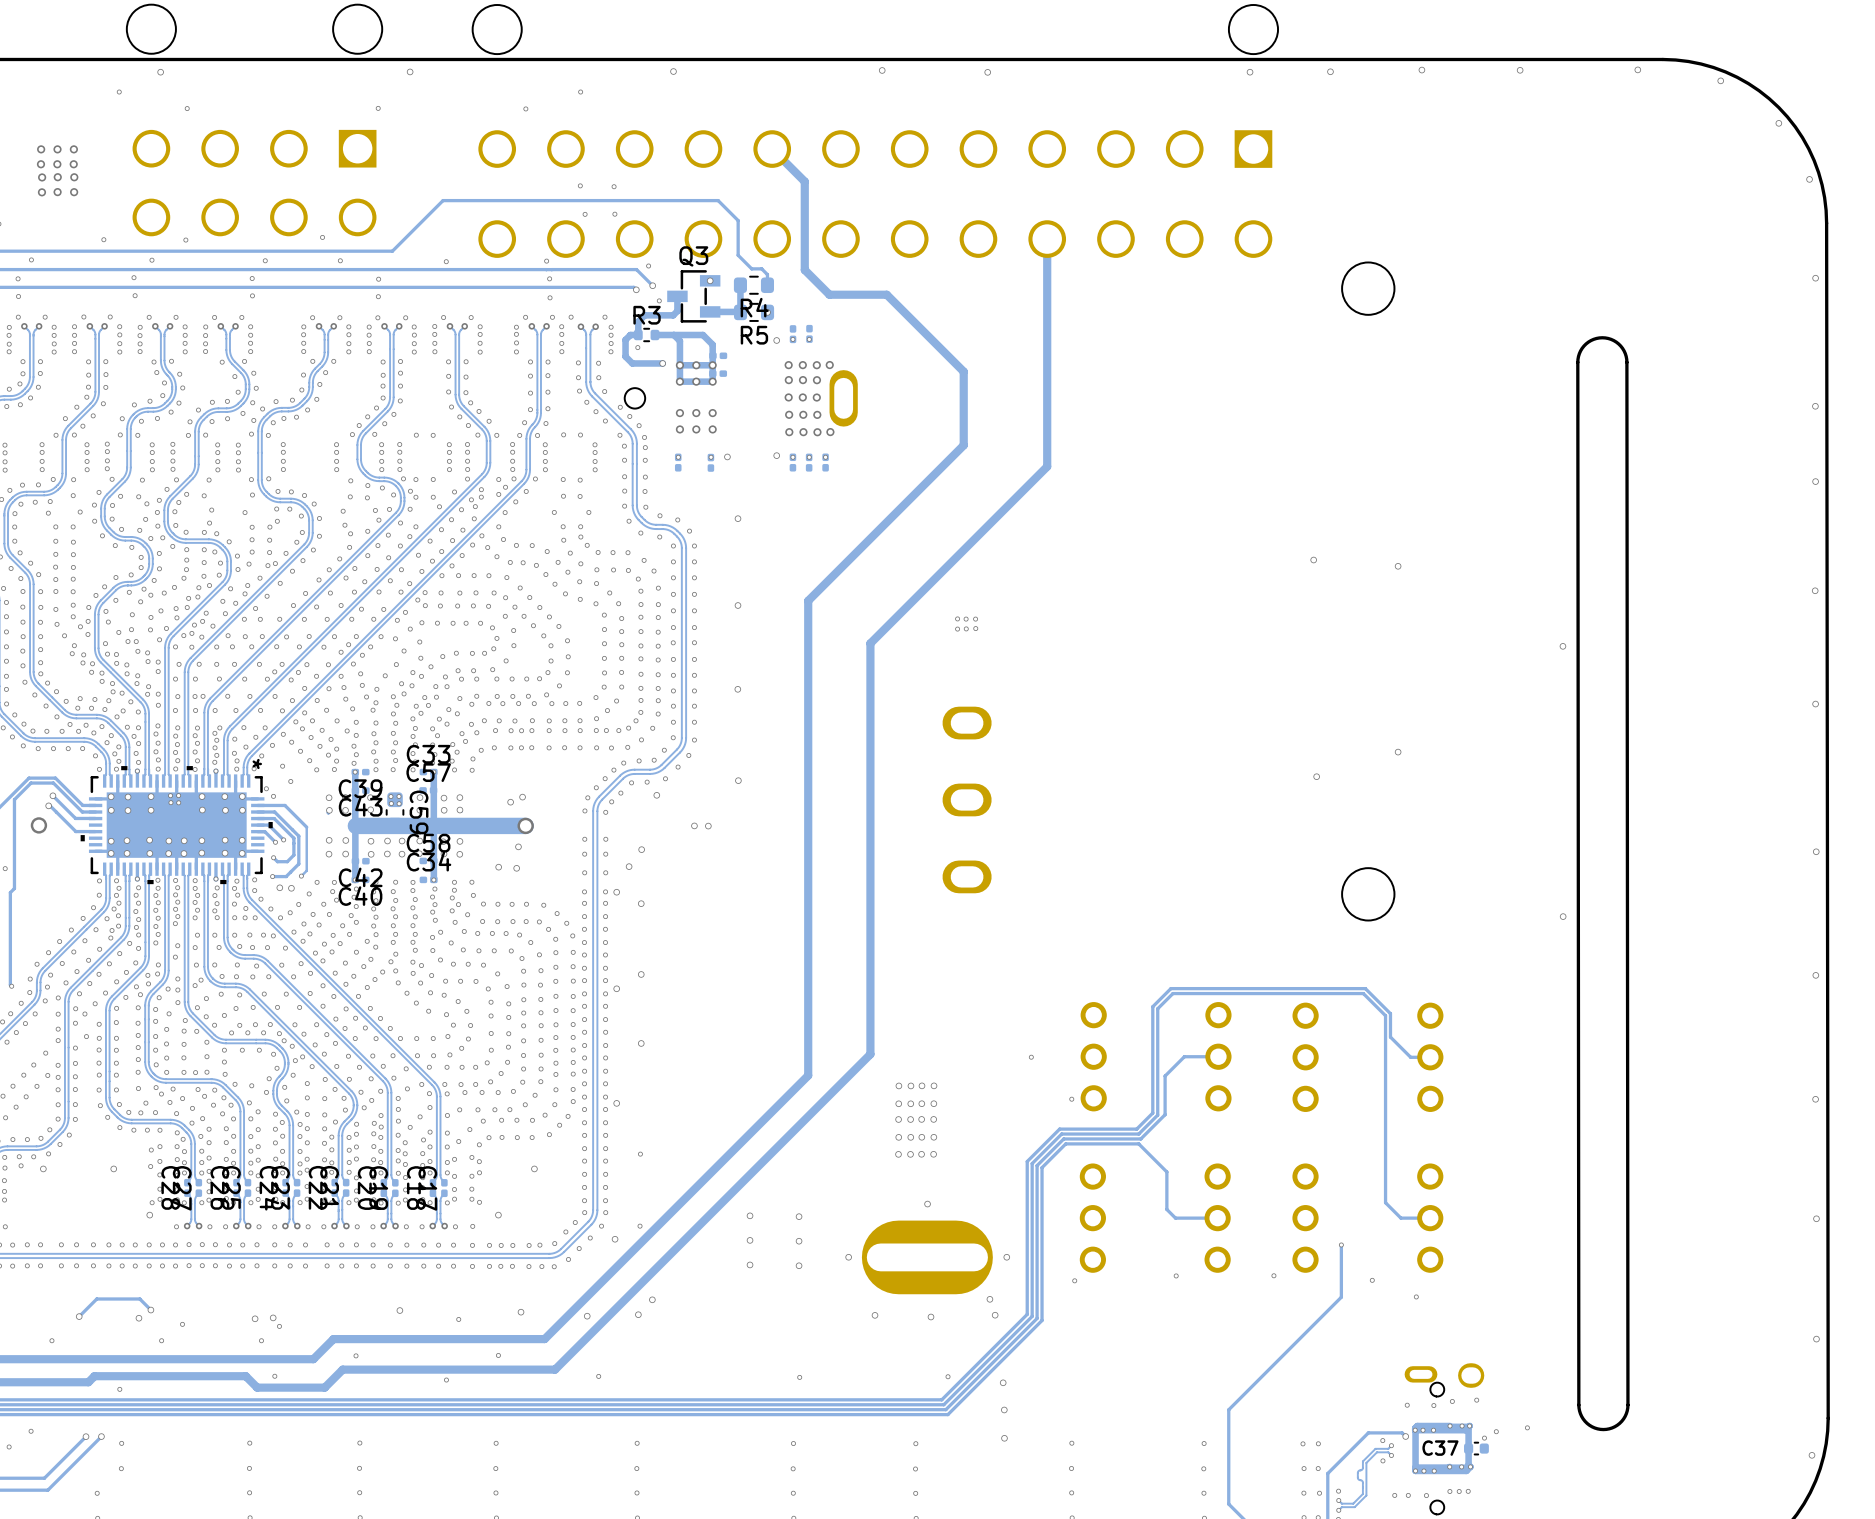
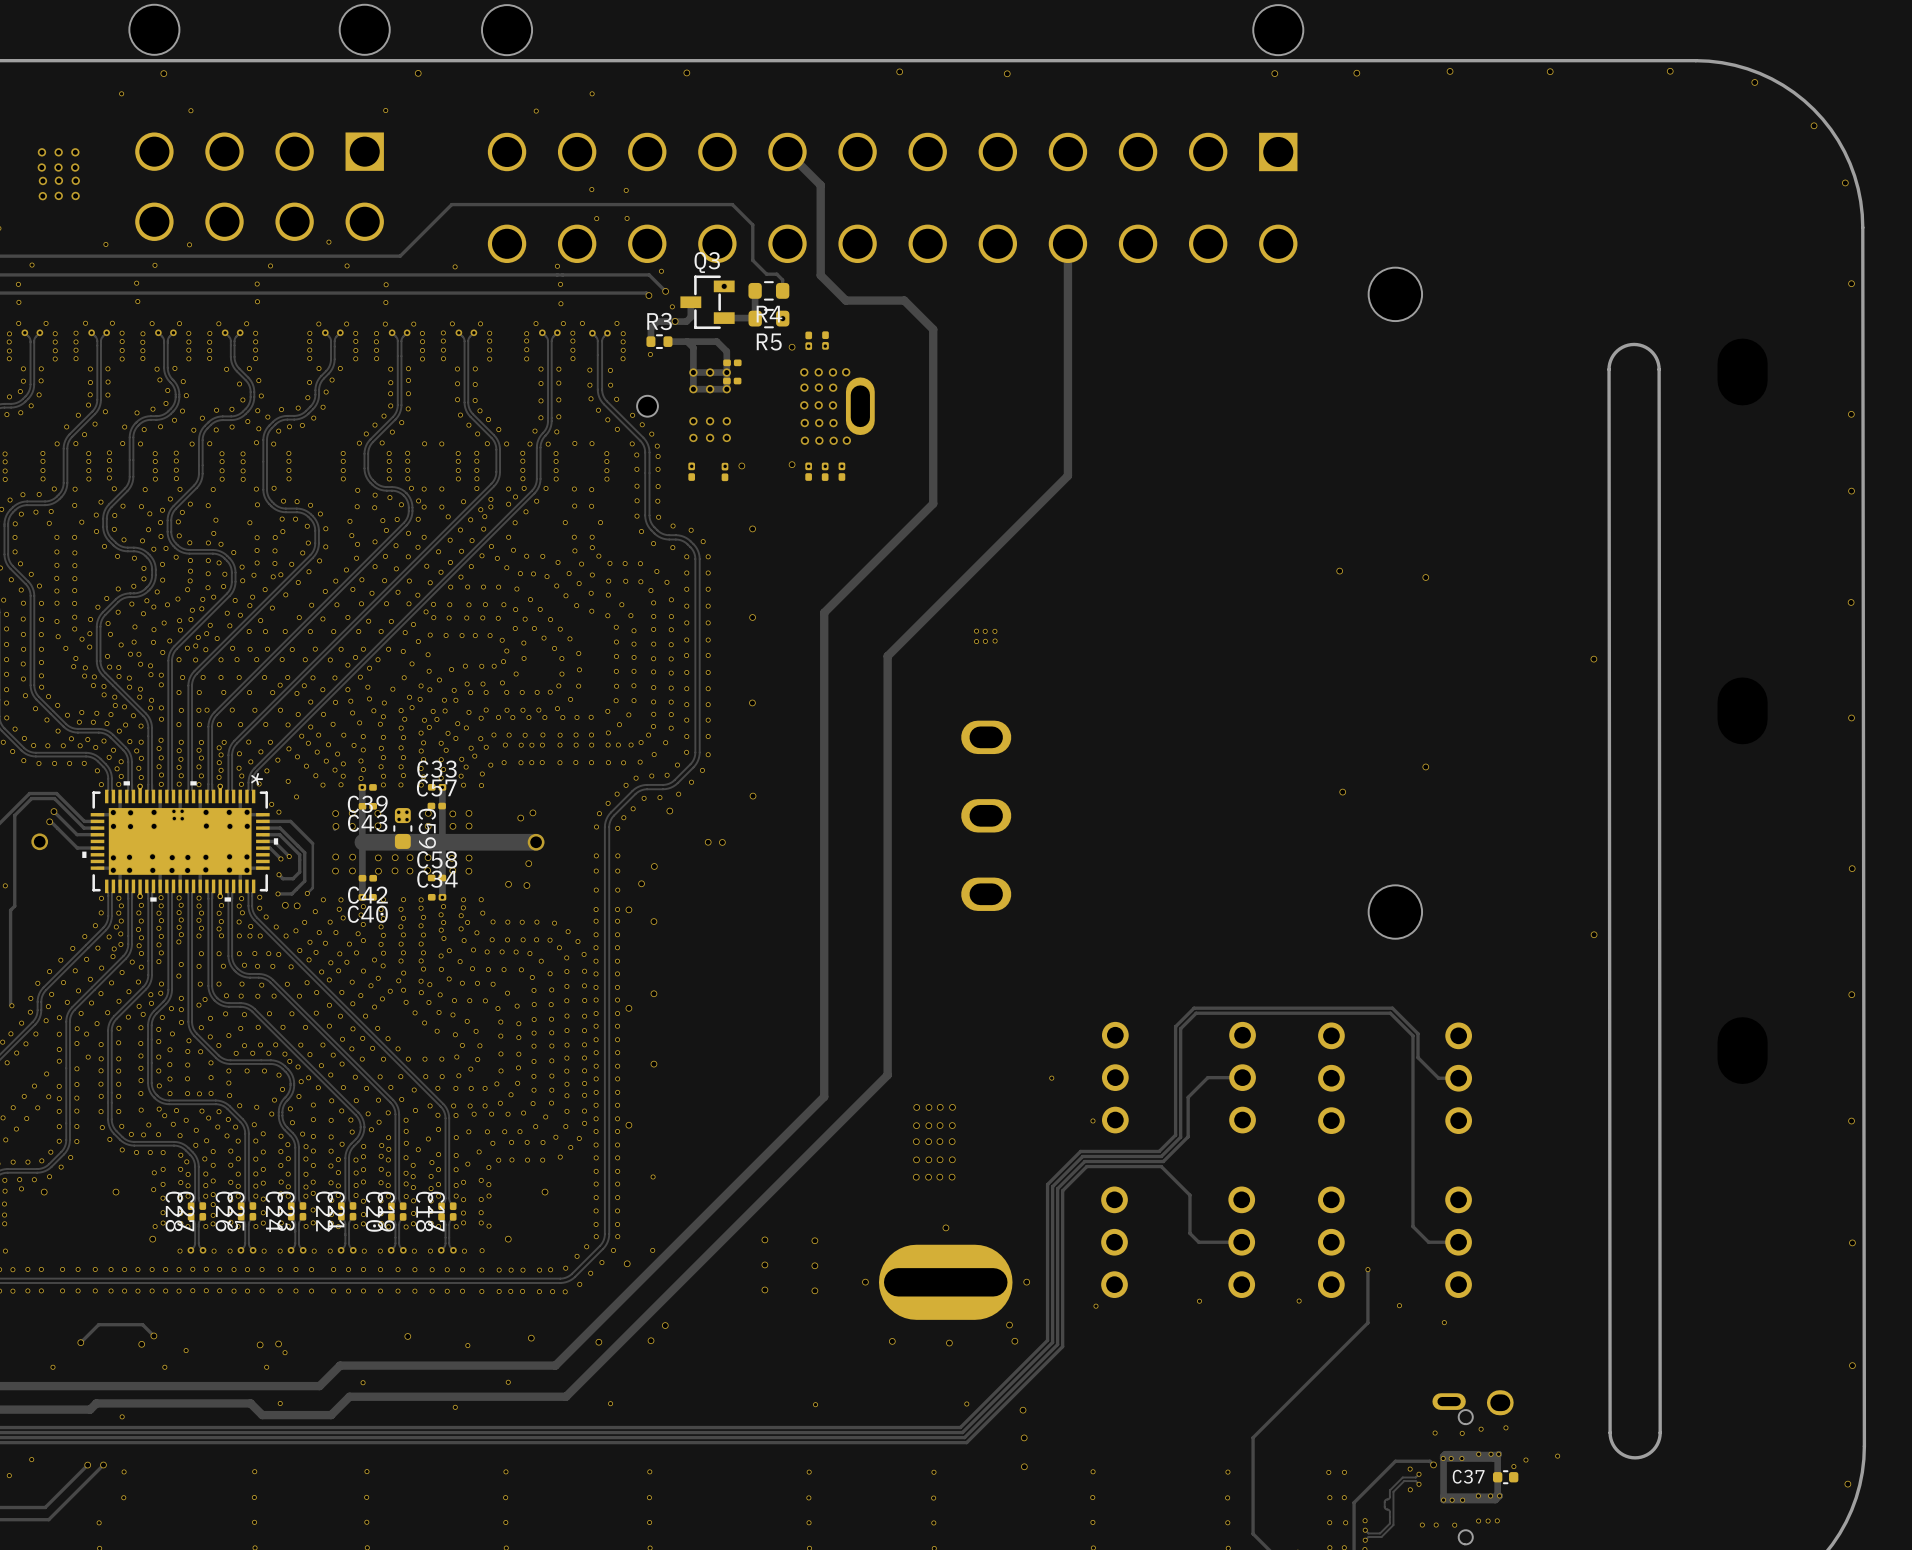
track: (915, 323) (963, 371) (963, 445) (915, 493) -> (933, 329) (933, 503)
track: (638, 335) (630, 335) (625, 339) (625, 356) (632, 363) (662, 363) -> none
via position: (662, 363) -> (675, 321)

